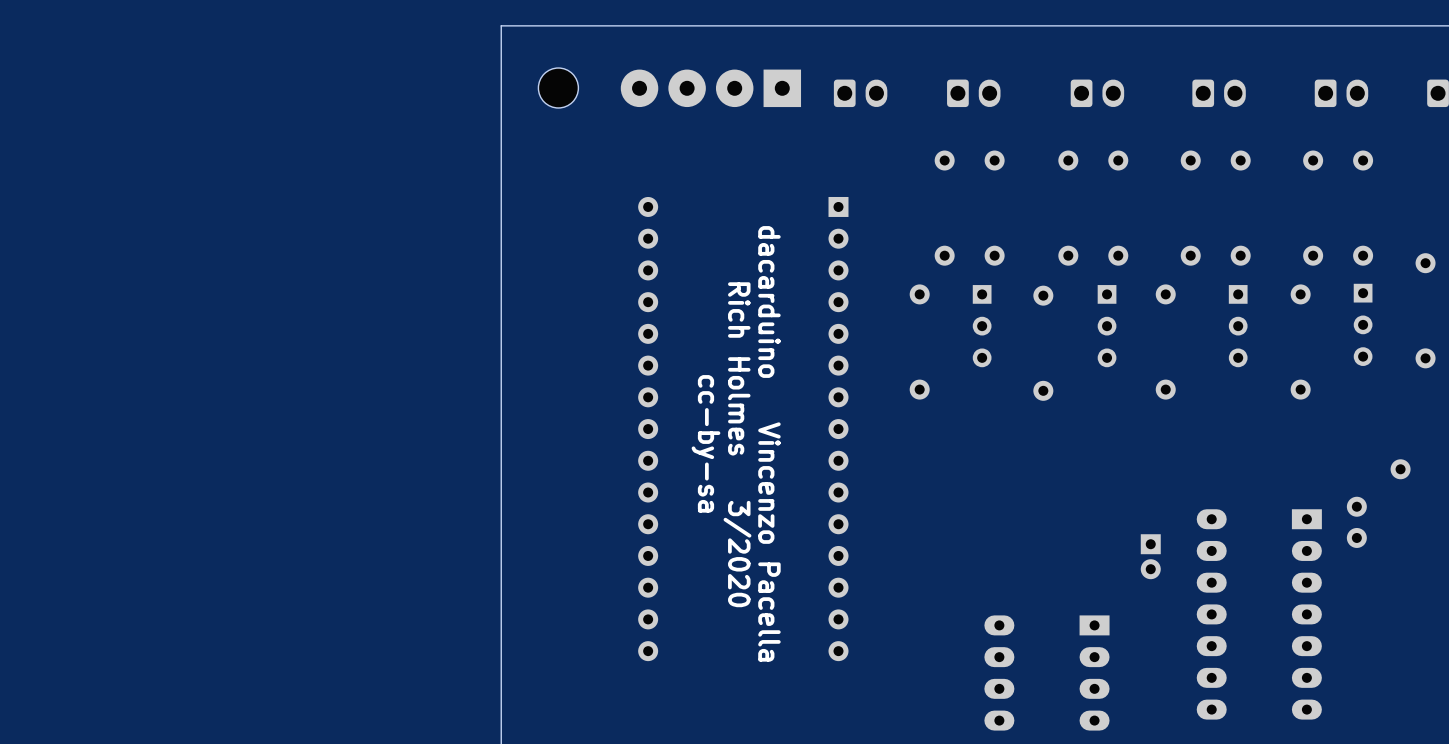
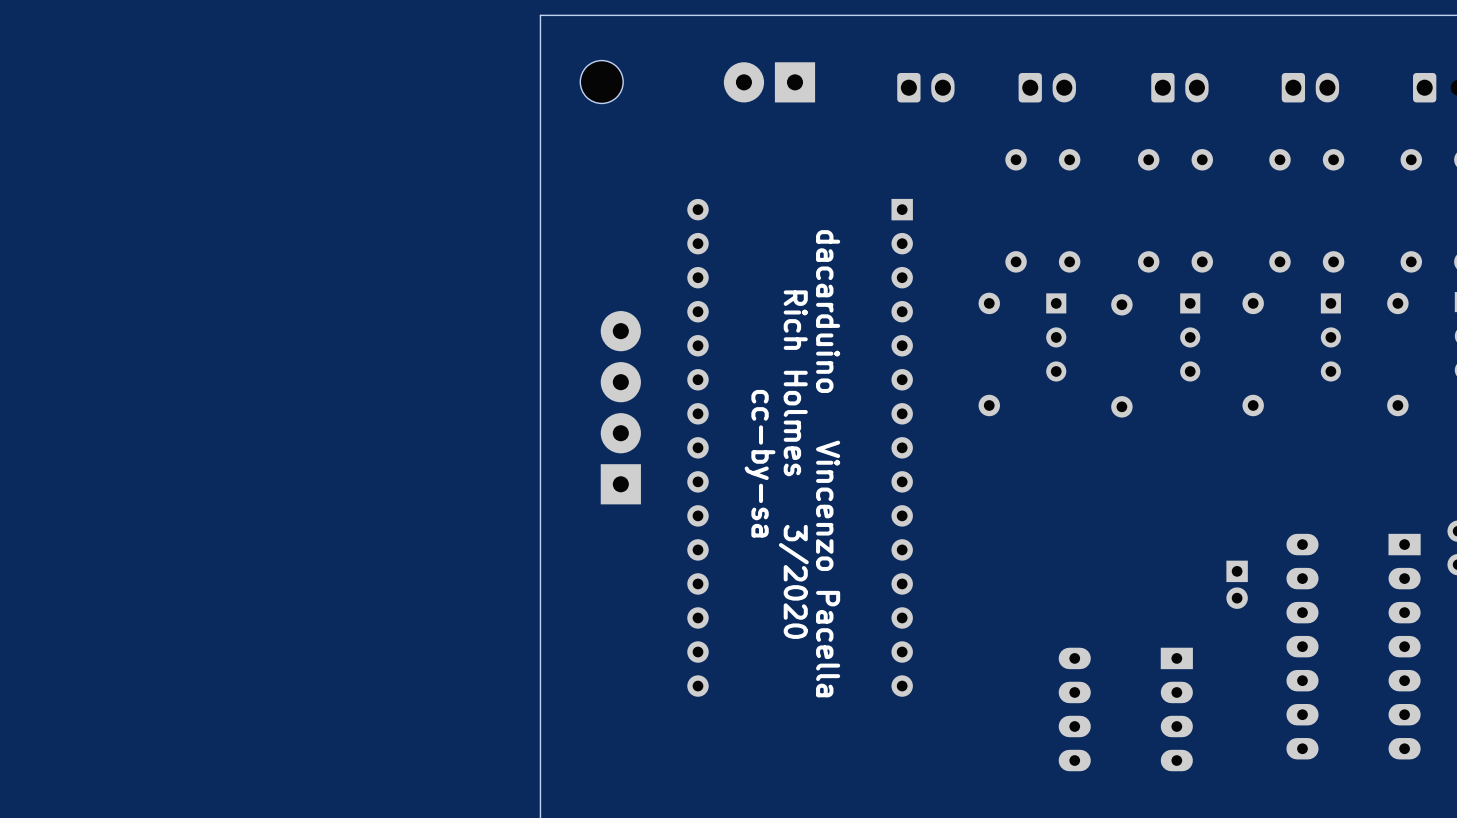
part footprint: [620, 69, 802, 108] -> [723, 62, 816, 103]
part: none -> (620, 407)

